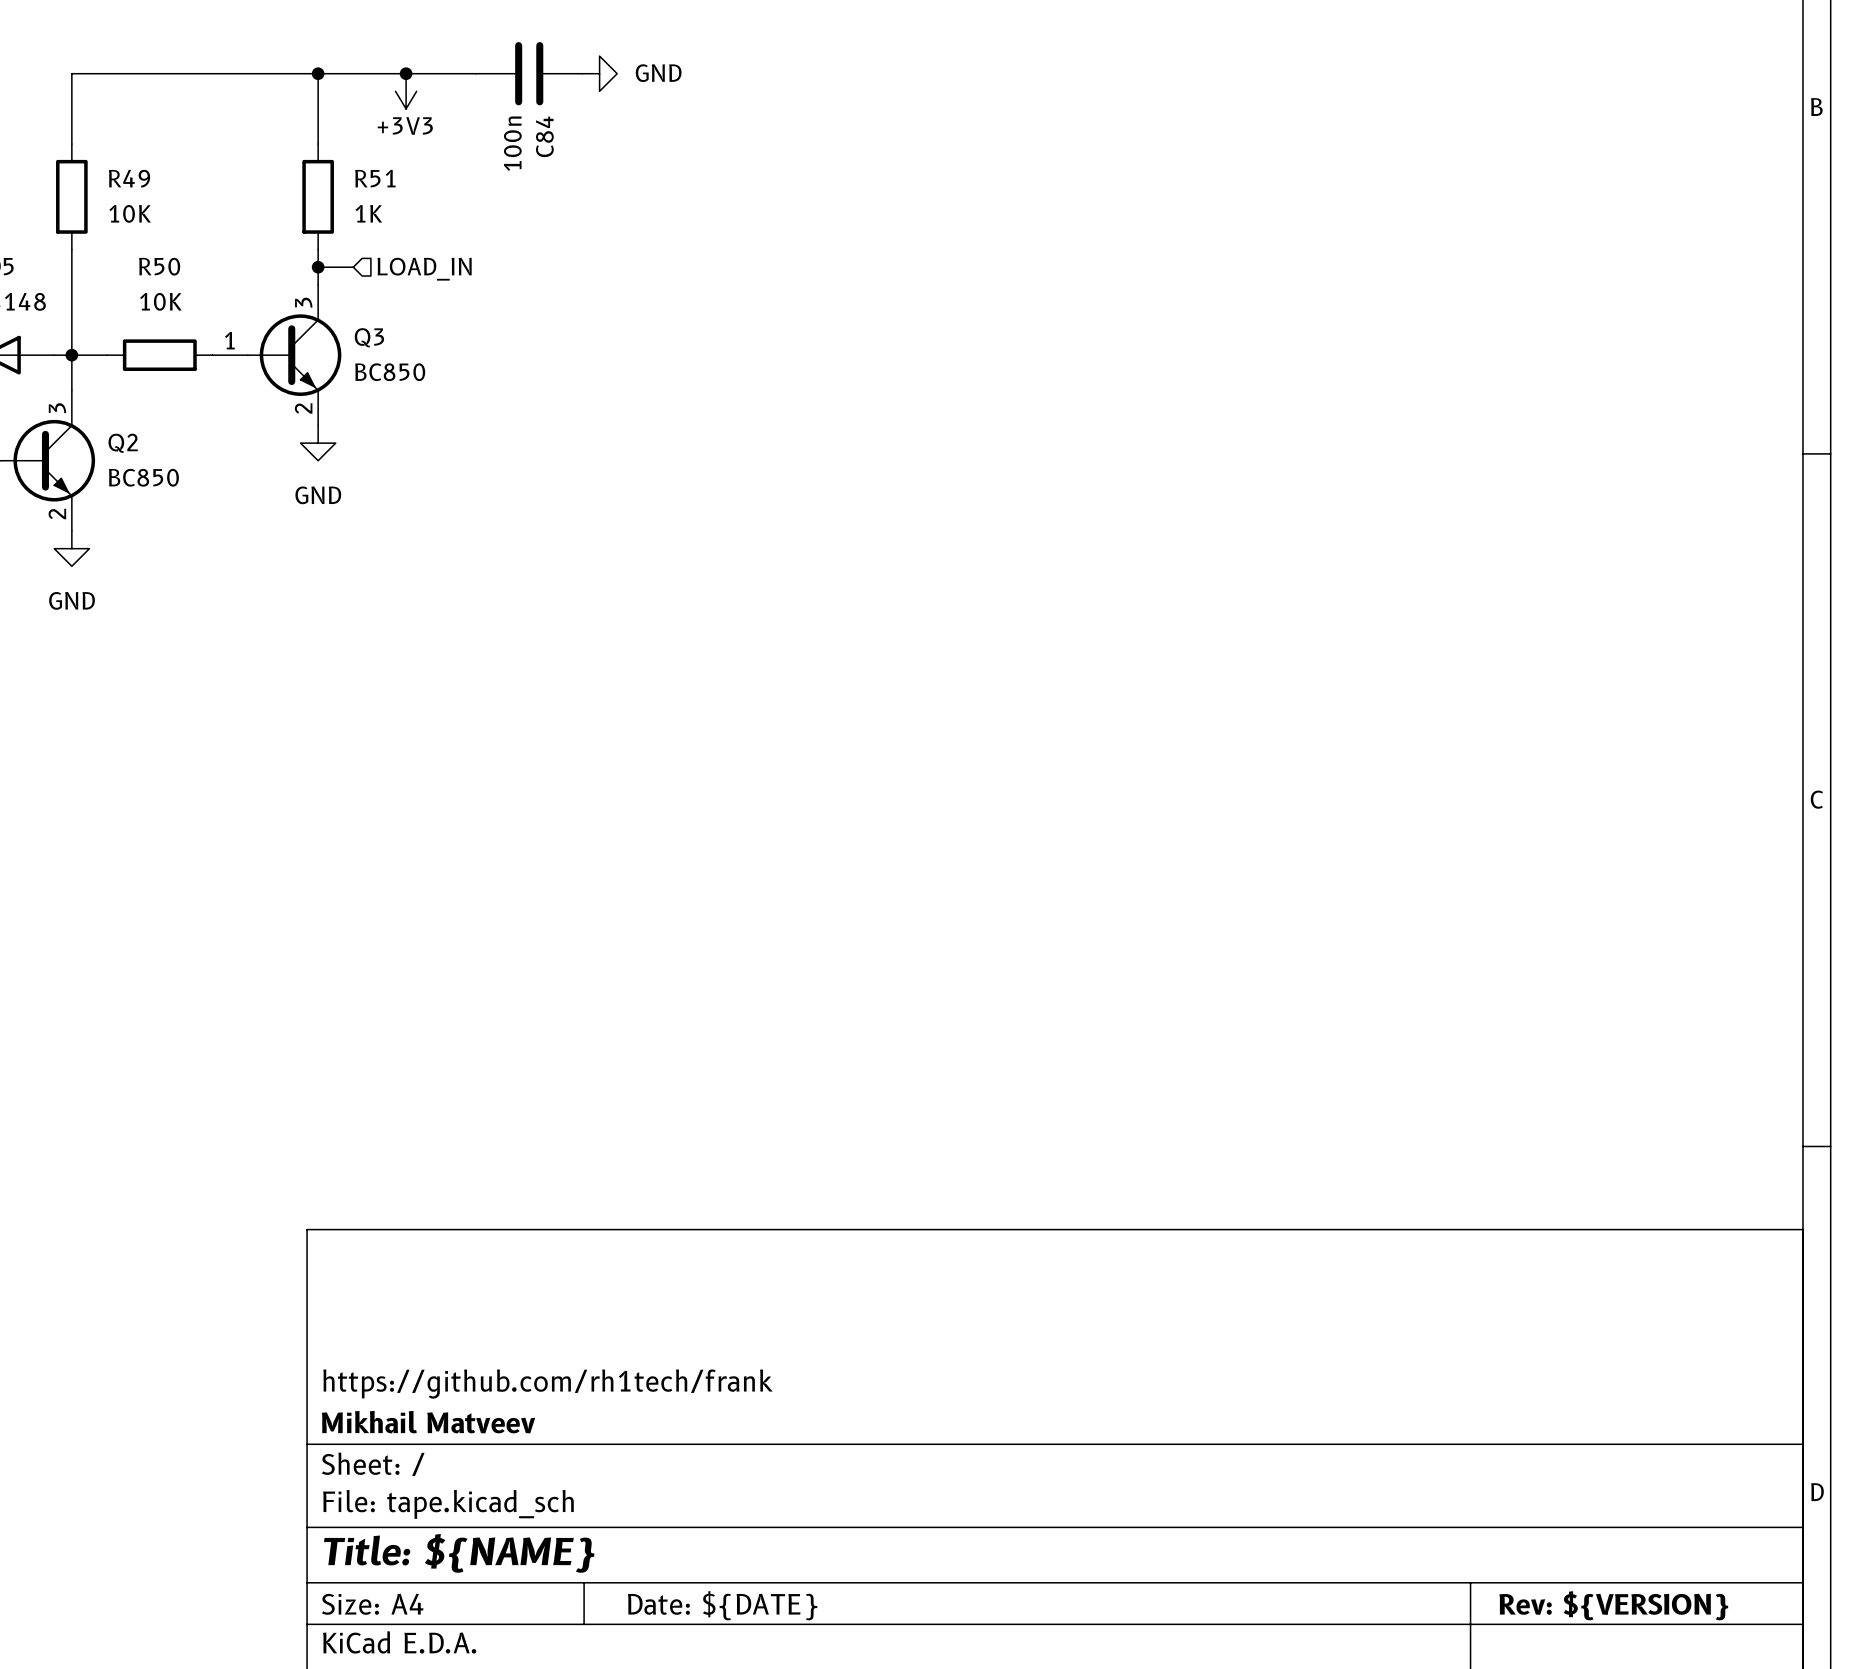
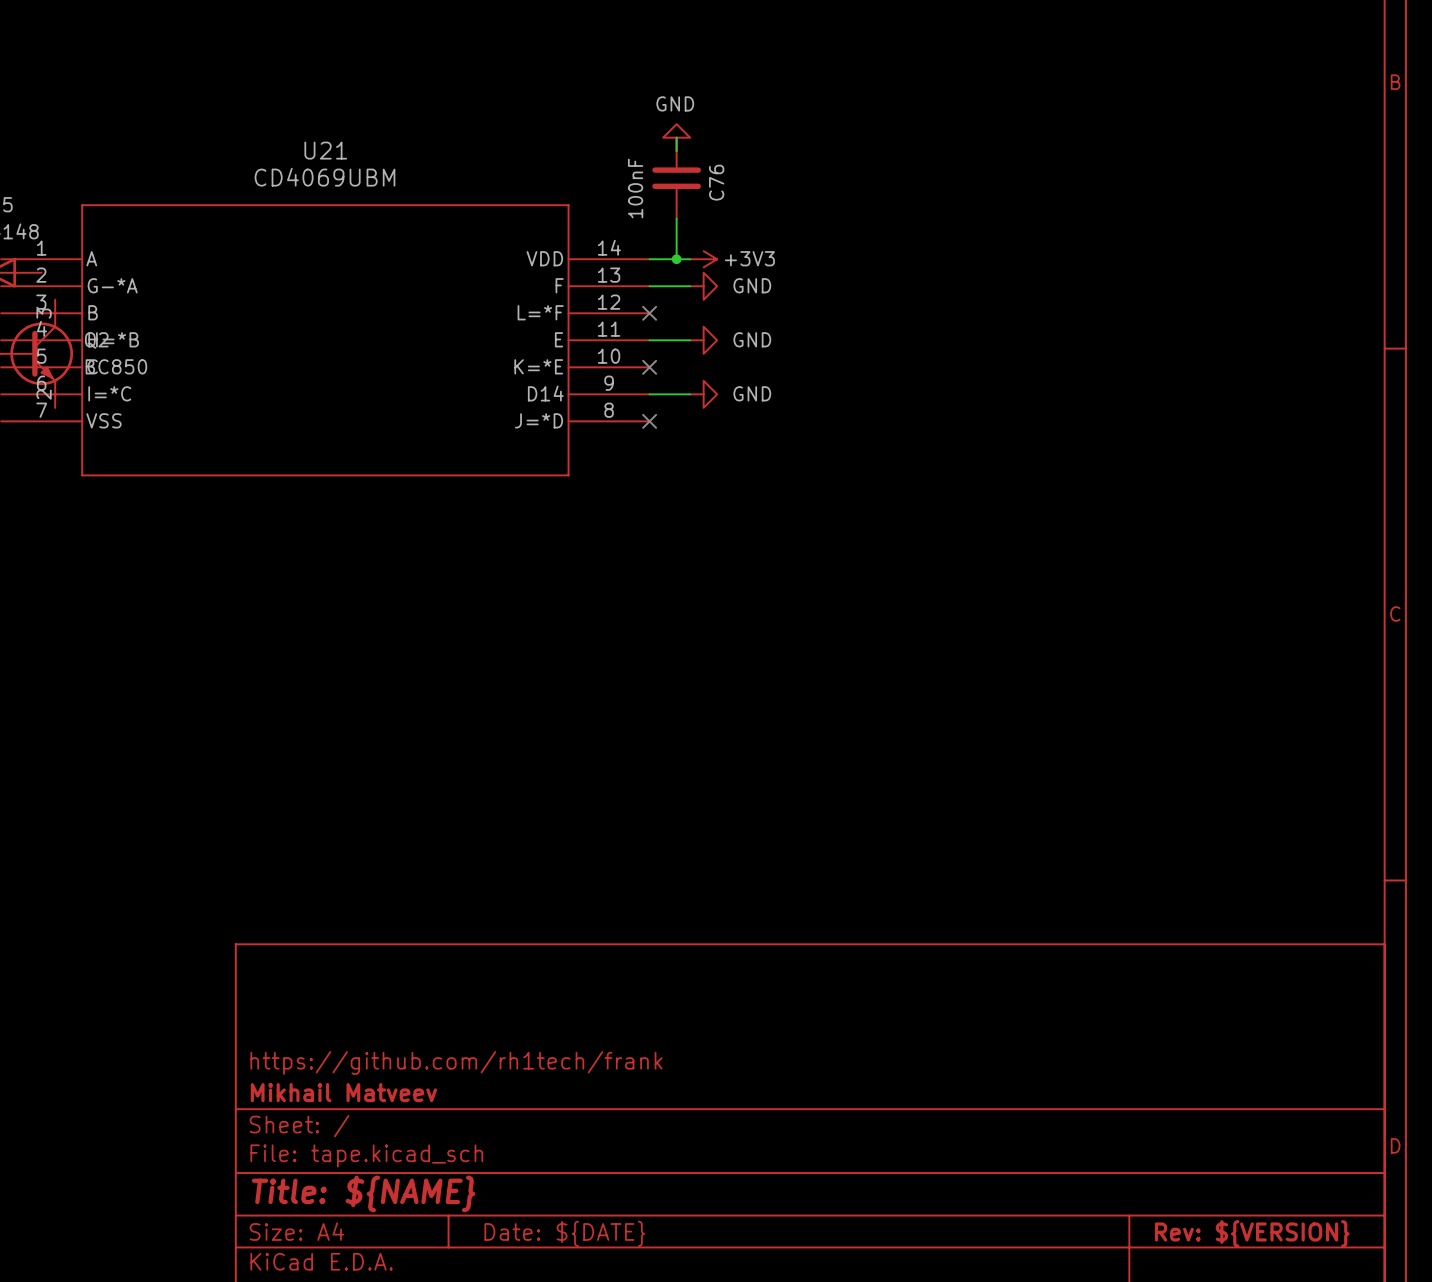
wire: (318, 73) (318, 144) -> none
junction: (318, 73) -> none
junction: (406, 73) -> none
wire: (476, 73) (71, 73) (71, 144) -> none
C84: 100n (529, 73) -> none
power symbol: GND (599, 73) -> none
power symbol: +3V3 (406, 91) -> none
wire: none -> (676, 137) (676, 151)
power symbol: none -> GND (676, 137)
R49: 10K (71, 196) -> none
R51: 1K (318, 196) -> none
C76: none -> 100nF (676, 178)
wire: (71, 249) (71, 390) -> none
wire: (318, 249) (318, 284) -> none
junction: (318, 267) -> none
hierarchical label: LOAD_IN (424, 269) -> none
wire: none -> (676, 218) (676, 259)
wire: none -> (649, 259) (690, 259)
junction: none -> (676, 259)
power symbol: none -> +3V3 (703, 259)
wire: (54, 355) (107, 355) -> none
junction: (71, 355) -> none
R50: 10K (159, 355) -> none
Q3: BC850 (276, 355) -> none
wire: none -> (649, 286) (690, 286)
power symbol: none -> GND (703, 286)
no-connect mark: none -> (649, 313)
power symbol: GND (318, 443) -> none
U21: none -> CD4069UBM (325, 340)
wire: none -> (649, 340) (690, 340)
power symbol: none -> GND (703, 340)
no-connect mark: none -> (649, 367)
wire: none -> (649, 394) (690, 394)
power symbol: none -> GND (703, 394)
power symbol: GND (71, 548) -> none
no-connect mark: none -> (649, 421)

